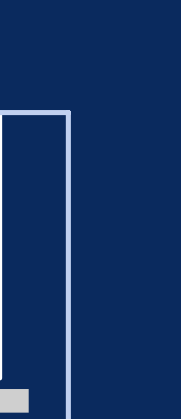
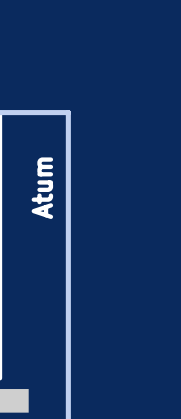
text: none -> Atum (42, 188)

